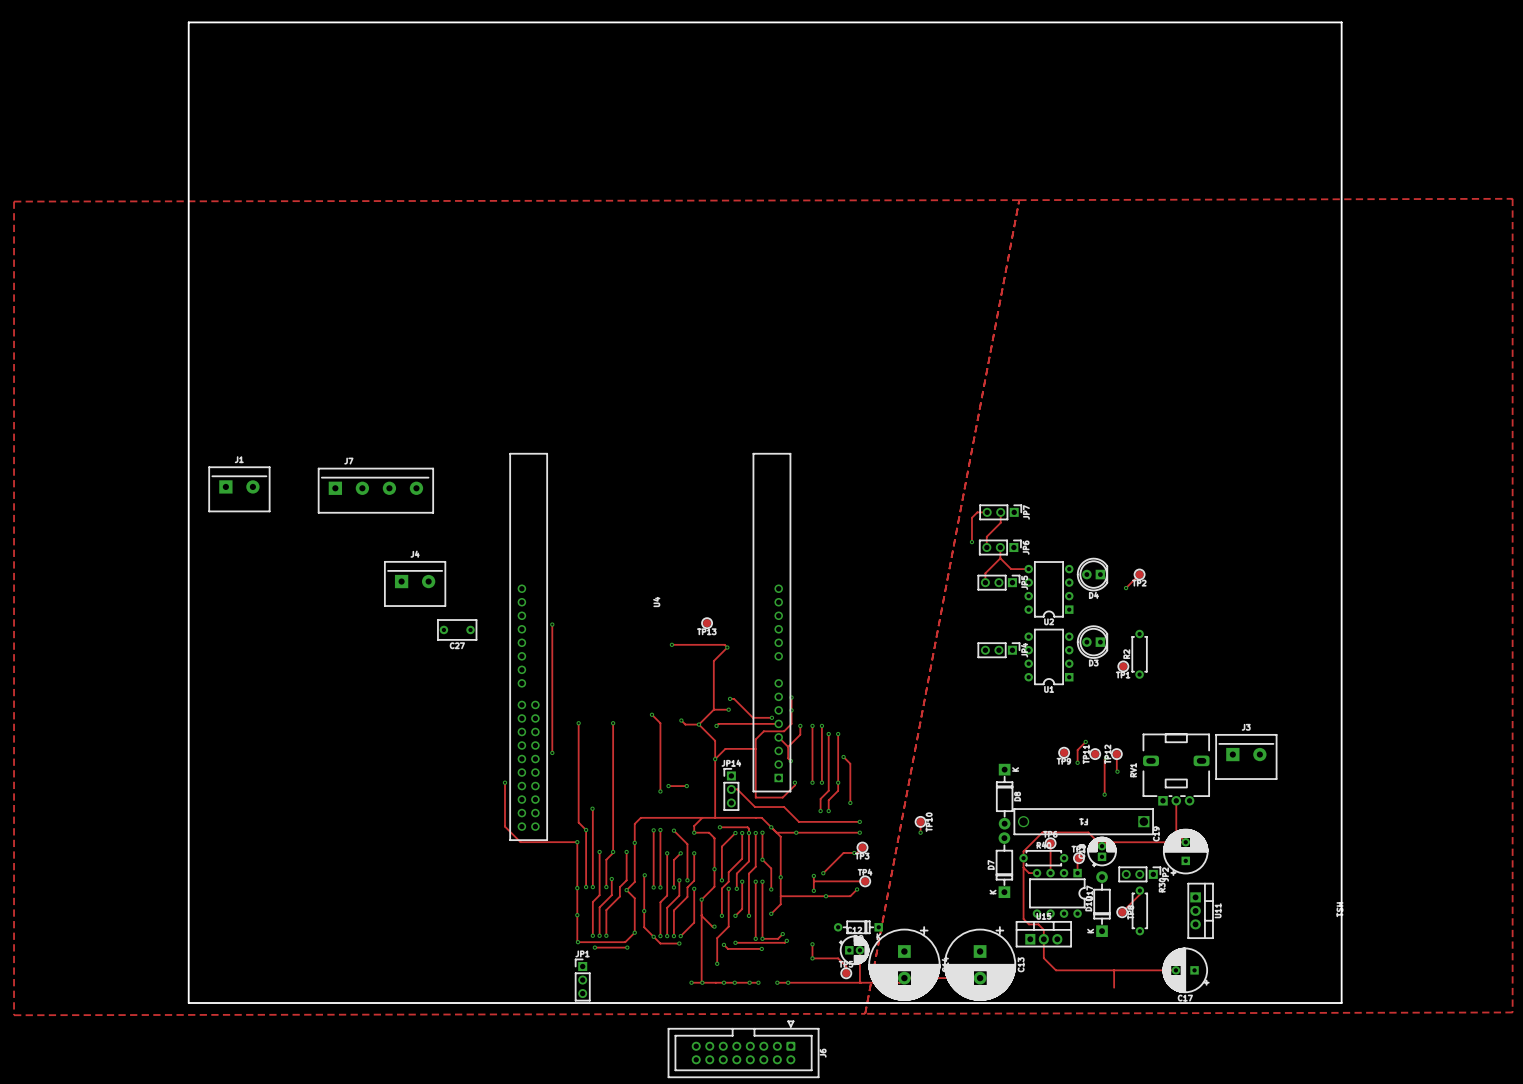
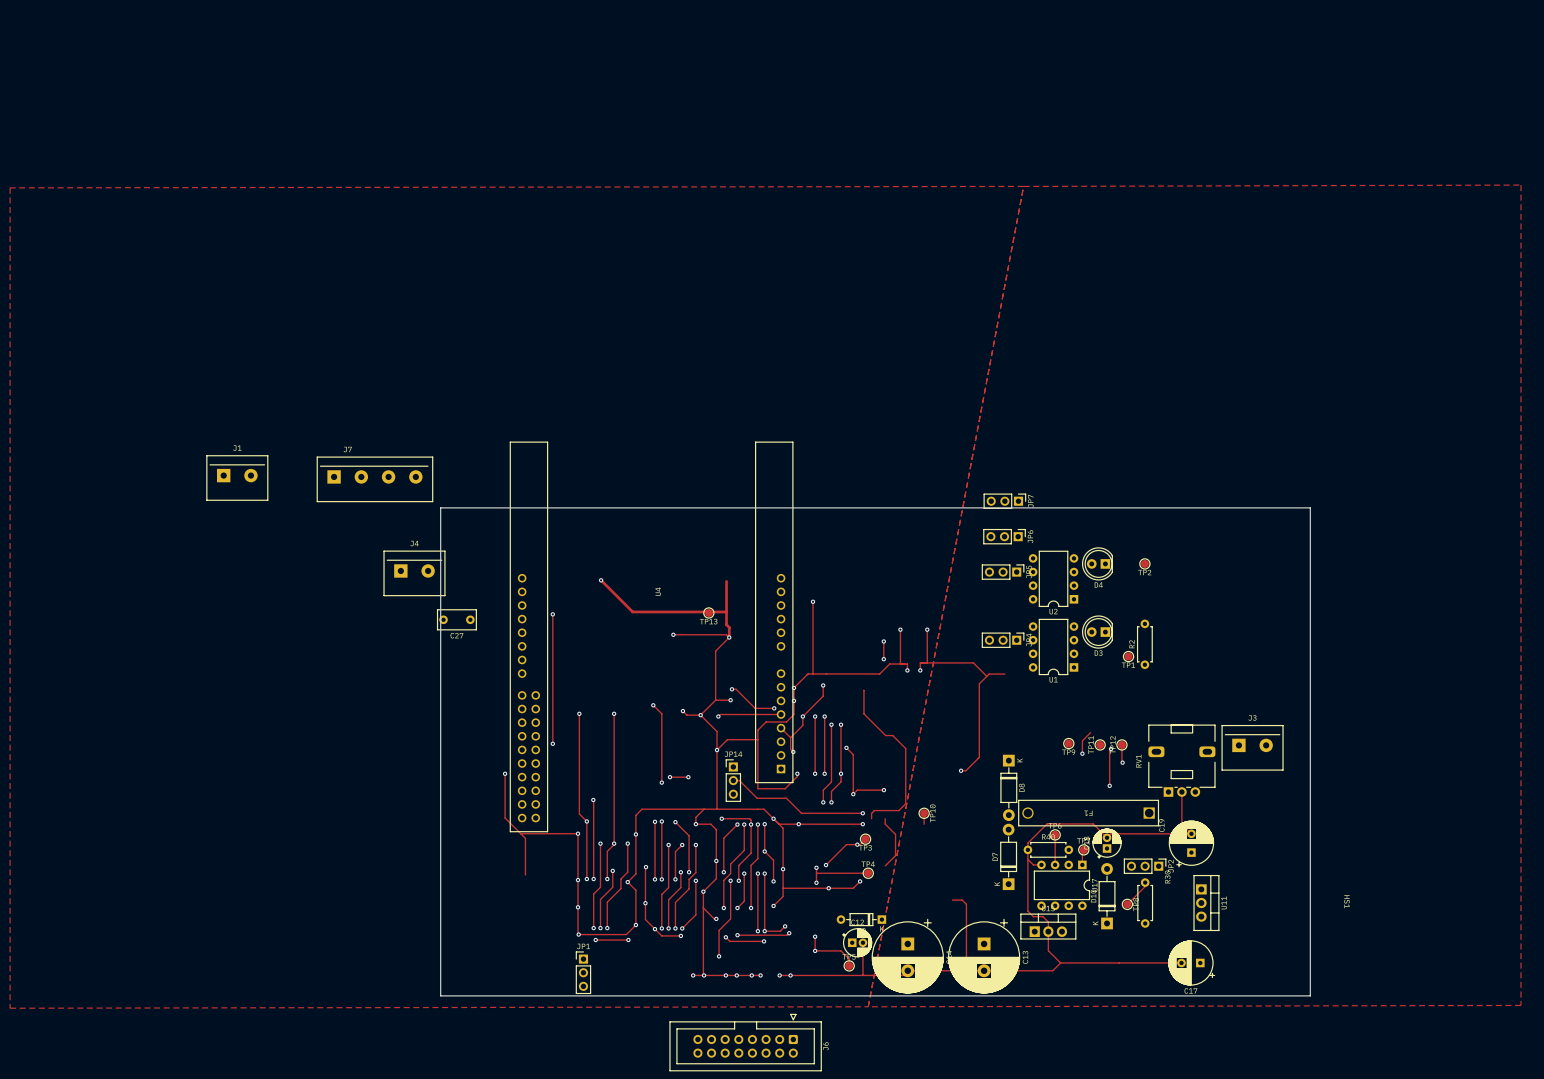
track: (987, 512) (977, 512) (971, 517) (971, 542) -> none
track: (1000, 512) (1000, 522) (986, 536) (986, 547) -> none
via: (971, 542) -> none
track: (1000, 547) (1000, 558) -> none
track: (1000, 558) (1011, 569) (1028, 569) -> none
track: (1000, 558) (985, 573) (985, 582) -> none
track: (1139, 574) (1126, 588) -> none
via: (1126, 588) -> none
track: none -> (601, 580) (632, 611) (726, 611)
via: none -> (601, 580)
track: none -> (726, 581) (726, 624) (729, 627)
track: none -> (813, 601) (813, 673)
via: none -> (813, 601)
track: none -> (729, 627) (729, 637)
track: none -> (900, 629) (900, 664)
via: none -> (900, 629)
track: none -> (927, 629) (927, 662)
via: none -> (927, 629)
track: none -> (883, 641) (883, 659)
via: none -> (883, 641)
via: none -> (883, 659)
track: none -> (907, 670) (907, 664) (889, 664) (879, 673) (807, 673) (794, 687)
via: none -> (907, 670)
track: none -> (920, 670) (920, 662) (973, 662) (986, 676)
via: none -> (920, 670)
track: none -> (1004, 674) (989, 674) (979, 683) (979, 757) (965, 770) (961, 770)
track: none -> (823, 685) (823, 696) (802, 716)
via: none -> (823, 685)
track: none -> (863, 690) (863, 713) (885, 735) (892, 735) (905, 748) (905, 803) (898, 810) (874, 810) (871, 813) (871, 818)
via: (1085, 741) -> none
via: none -> (961, 770)
track: none -> (883, 790) (857, 790) (853, 794)
via: none -> (883, 790)
track: none -> (885, 818) (885, 824) (895, 834) (895, 855) (885, 865)
via: (920, 832) -> none
track: none -> (520, 833) (525, 838) (525, 874)
track: none -> (952, 900) (962, 900) (966, 904) (966, 970)
track: none -> (1060, 962) (1052, 970) (984, 970)
track: (1114, 970) (1114, 987) -> none
board edge: (441, 1003) (188, 1003) (188, 22) (1341, 22) (1341, 1003) (1303, 1003) -> (440, 995) (440, 507) (1310, 507) (1310, 995)

